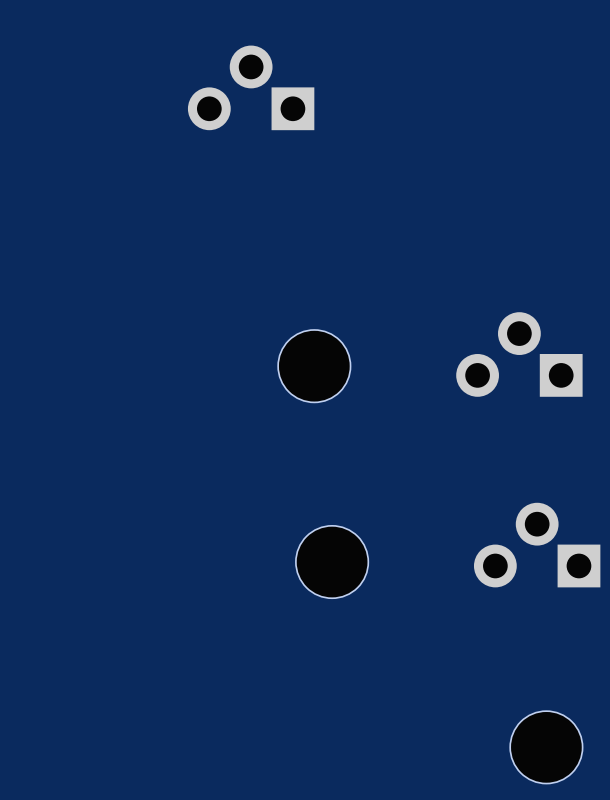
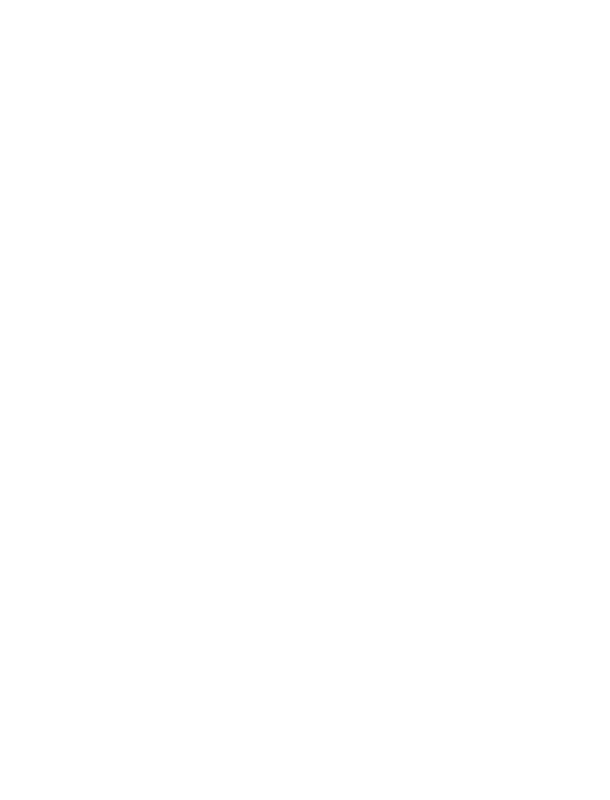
part: (251, 87) -> none
part: (519, 354) -> none
part: (314, 366) -> none
part: (537, 545) -> none
part: (332, 562) -> none
part: (546, 747) -> none

